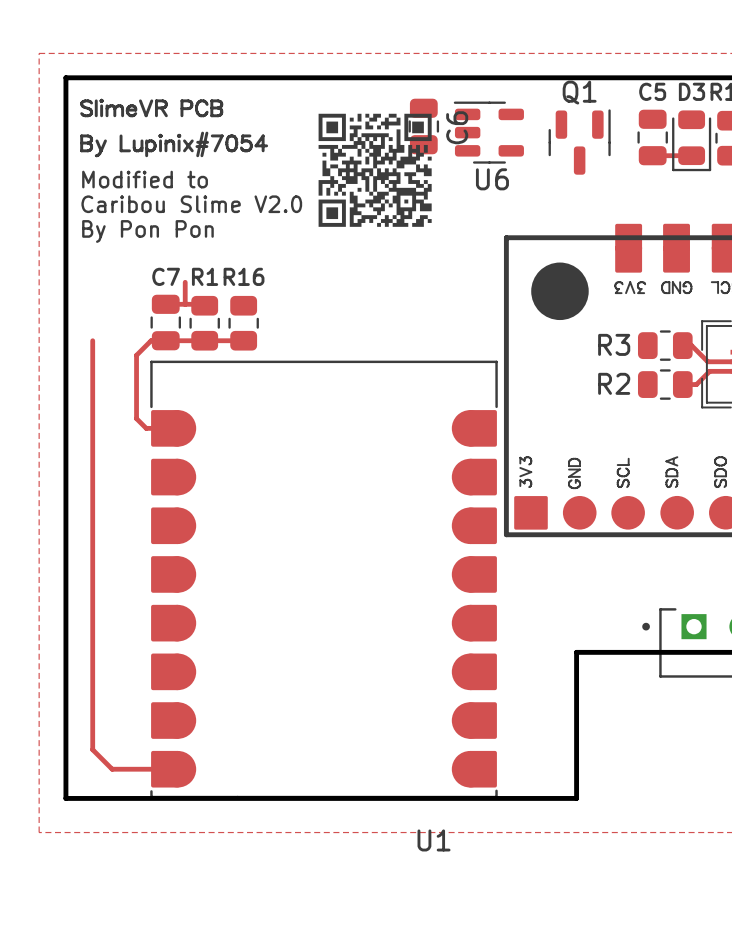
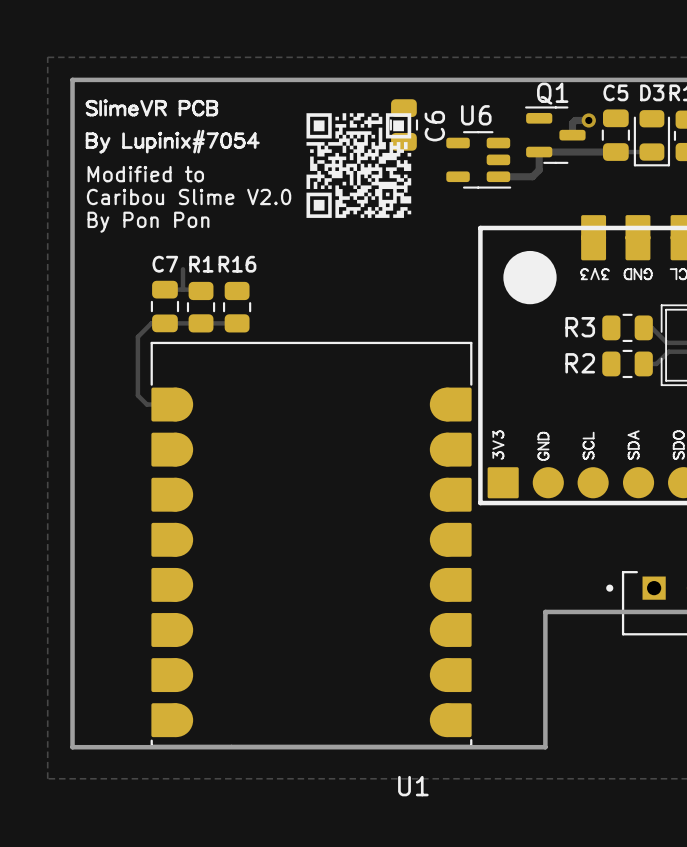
track: none -> (588, 120) (575, 120) (572, 123) (572, 135)
via: none -> (588, 120)
U6 rotation: 0° (488, 132) -> 180° (478, 159)
Q1 rotation: 0° (579, 142) -> 90° counterclockwise (555, 135)
track: none -> (615, 152) (539, 152) (539, 170) (532, 176) (498, 176)
track: (92, 340) (92, 749) (112, 769) (177, 769) -> none

